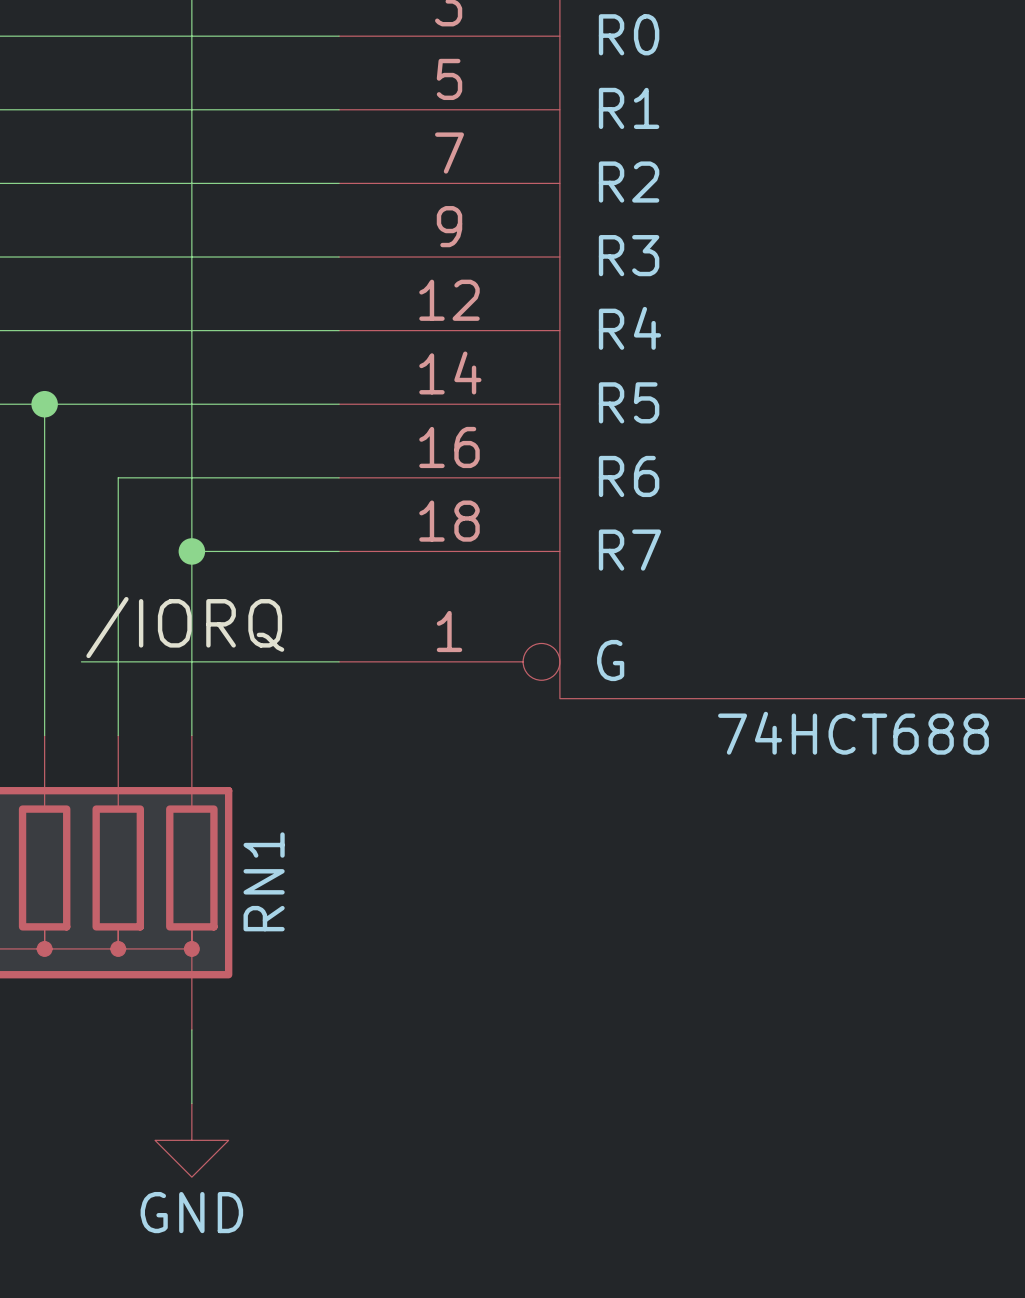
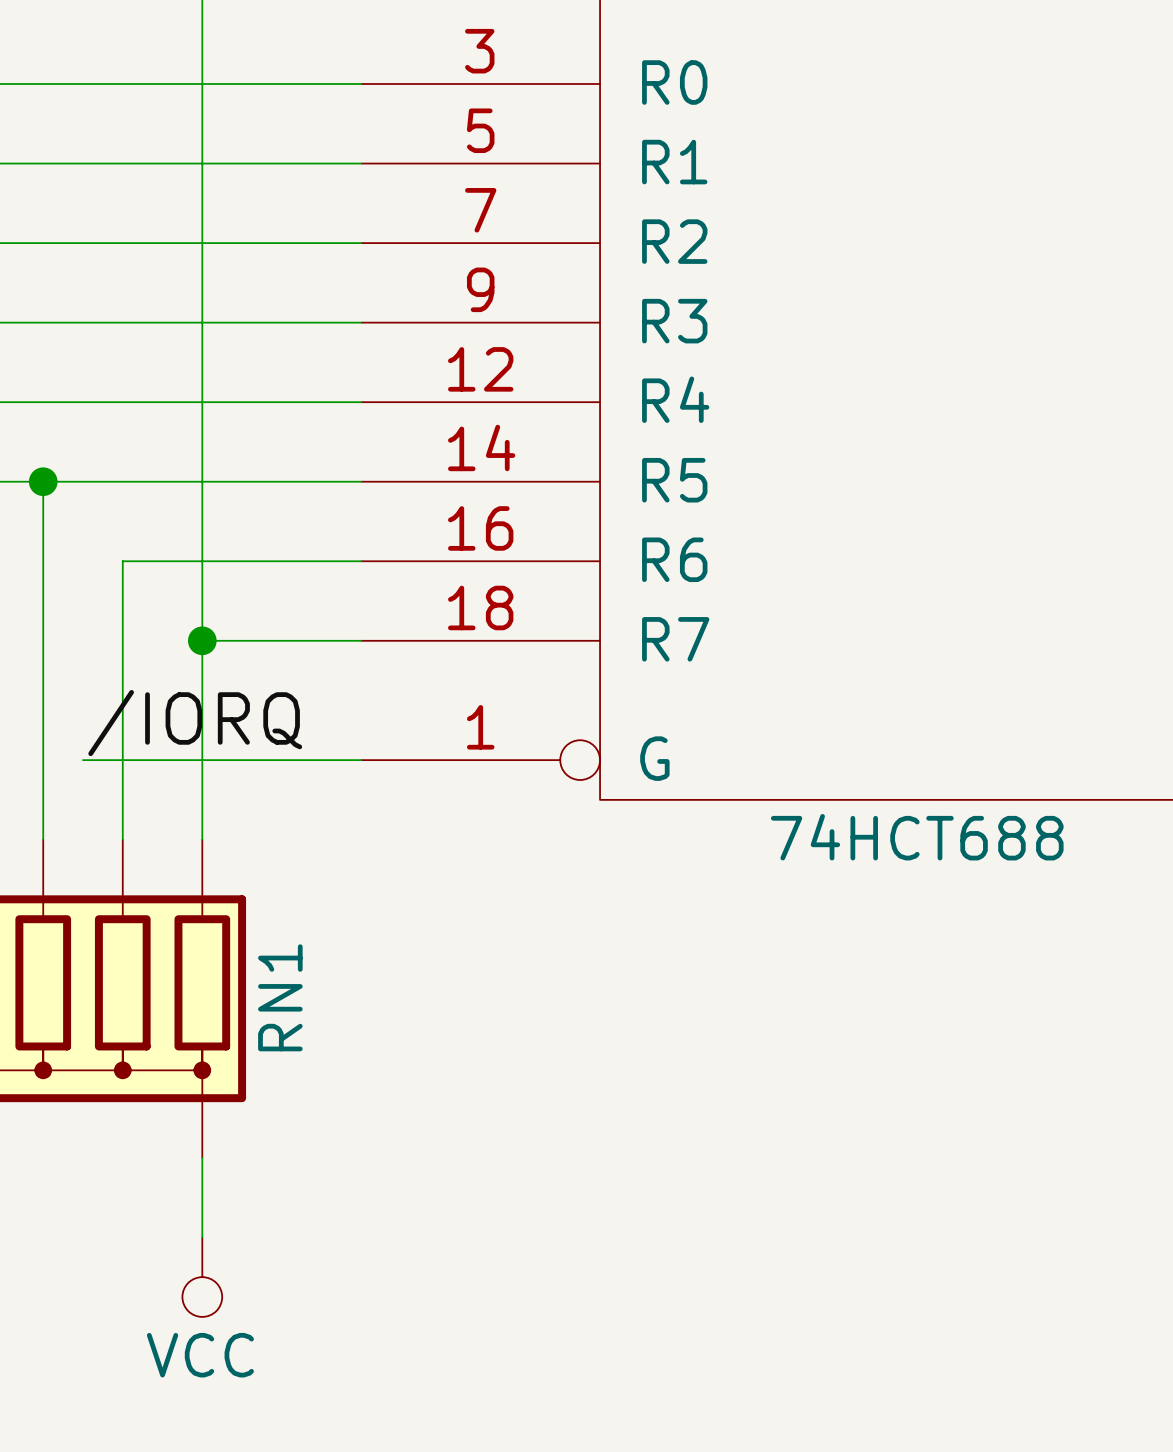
power symbol: GND (191, 1140) -> VCC (202, 1277)

